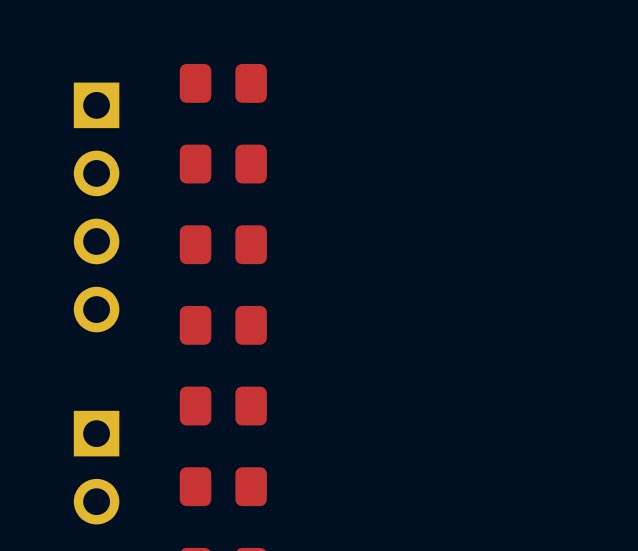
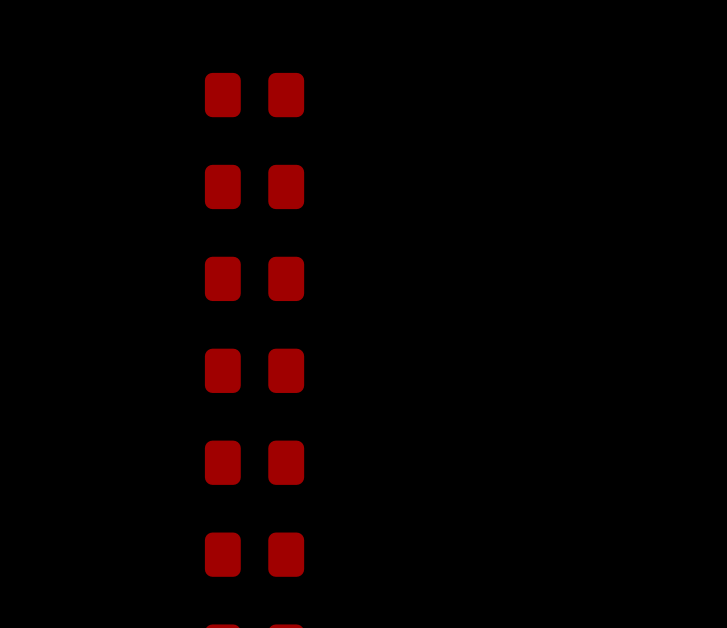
part: (96, 207) -> none
part: (96, 467) -> none

